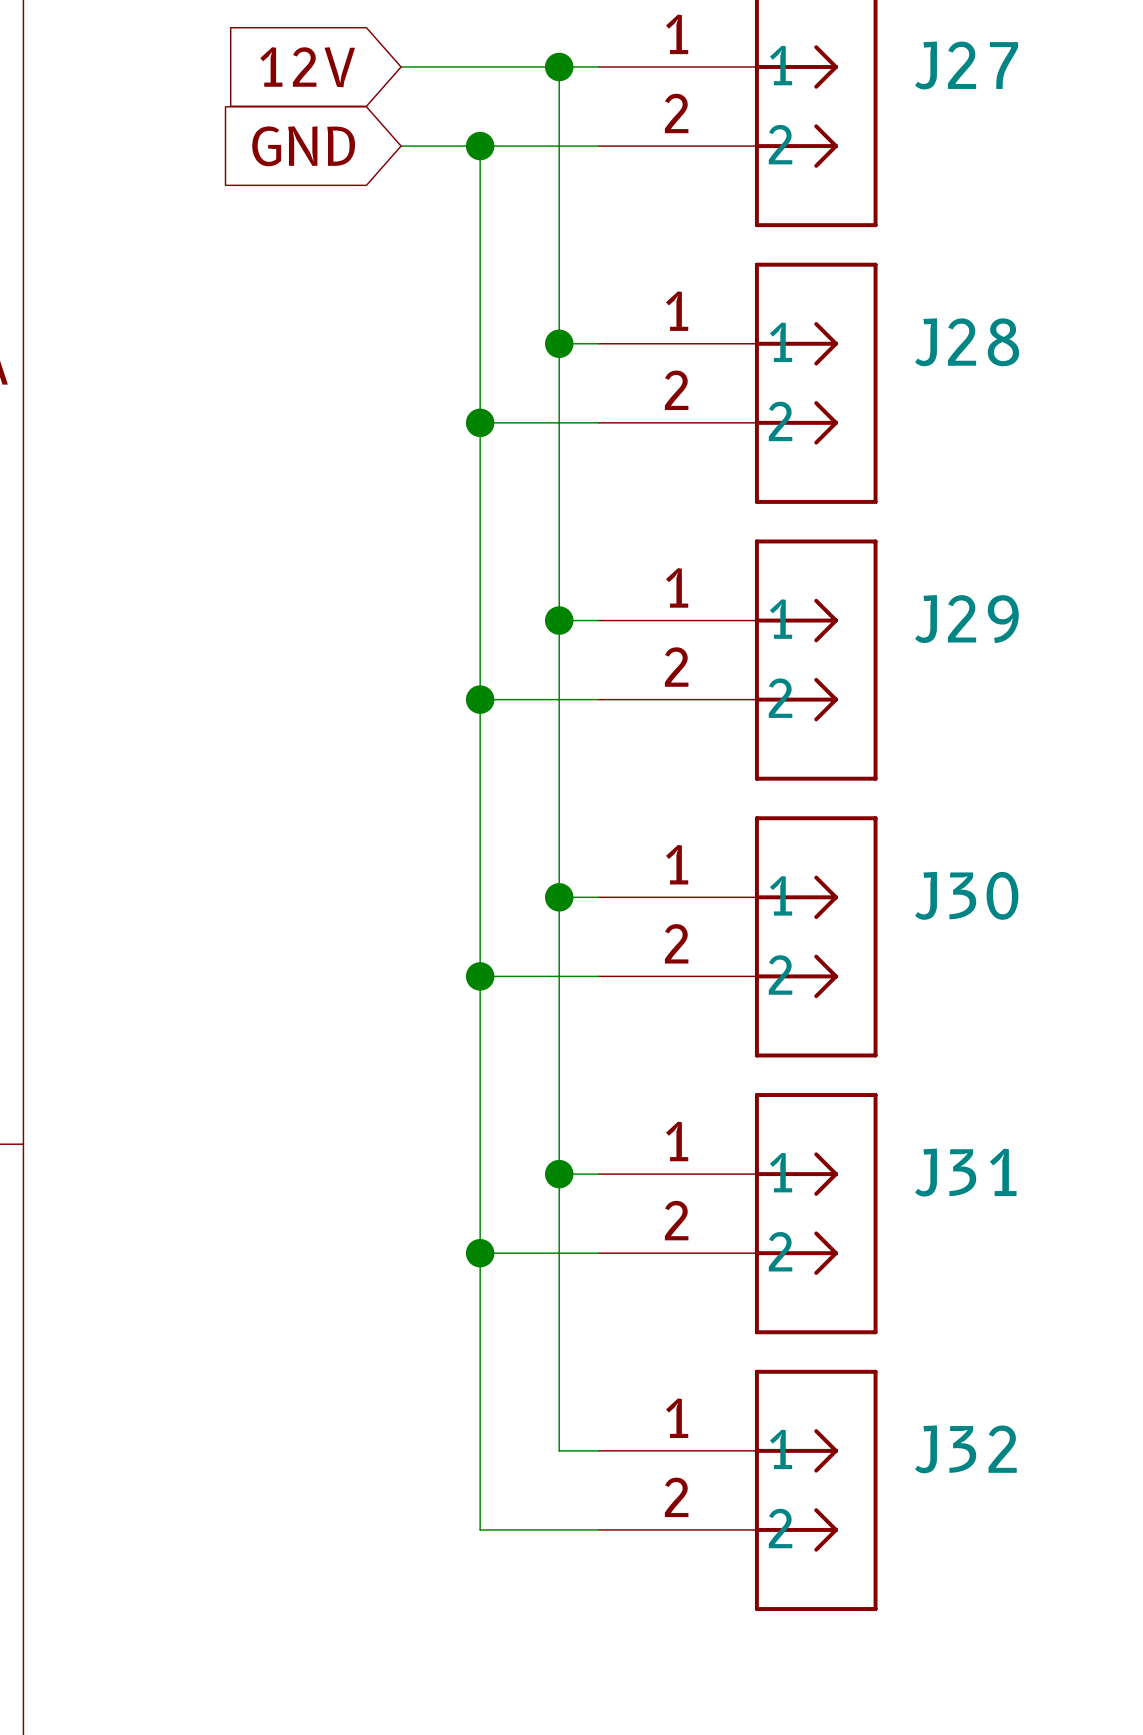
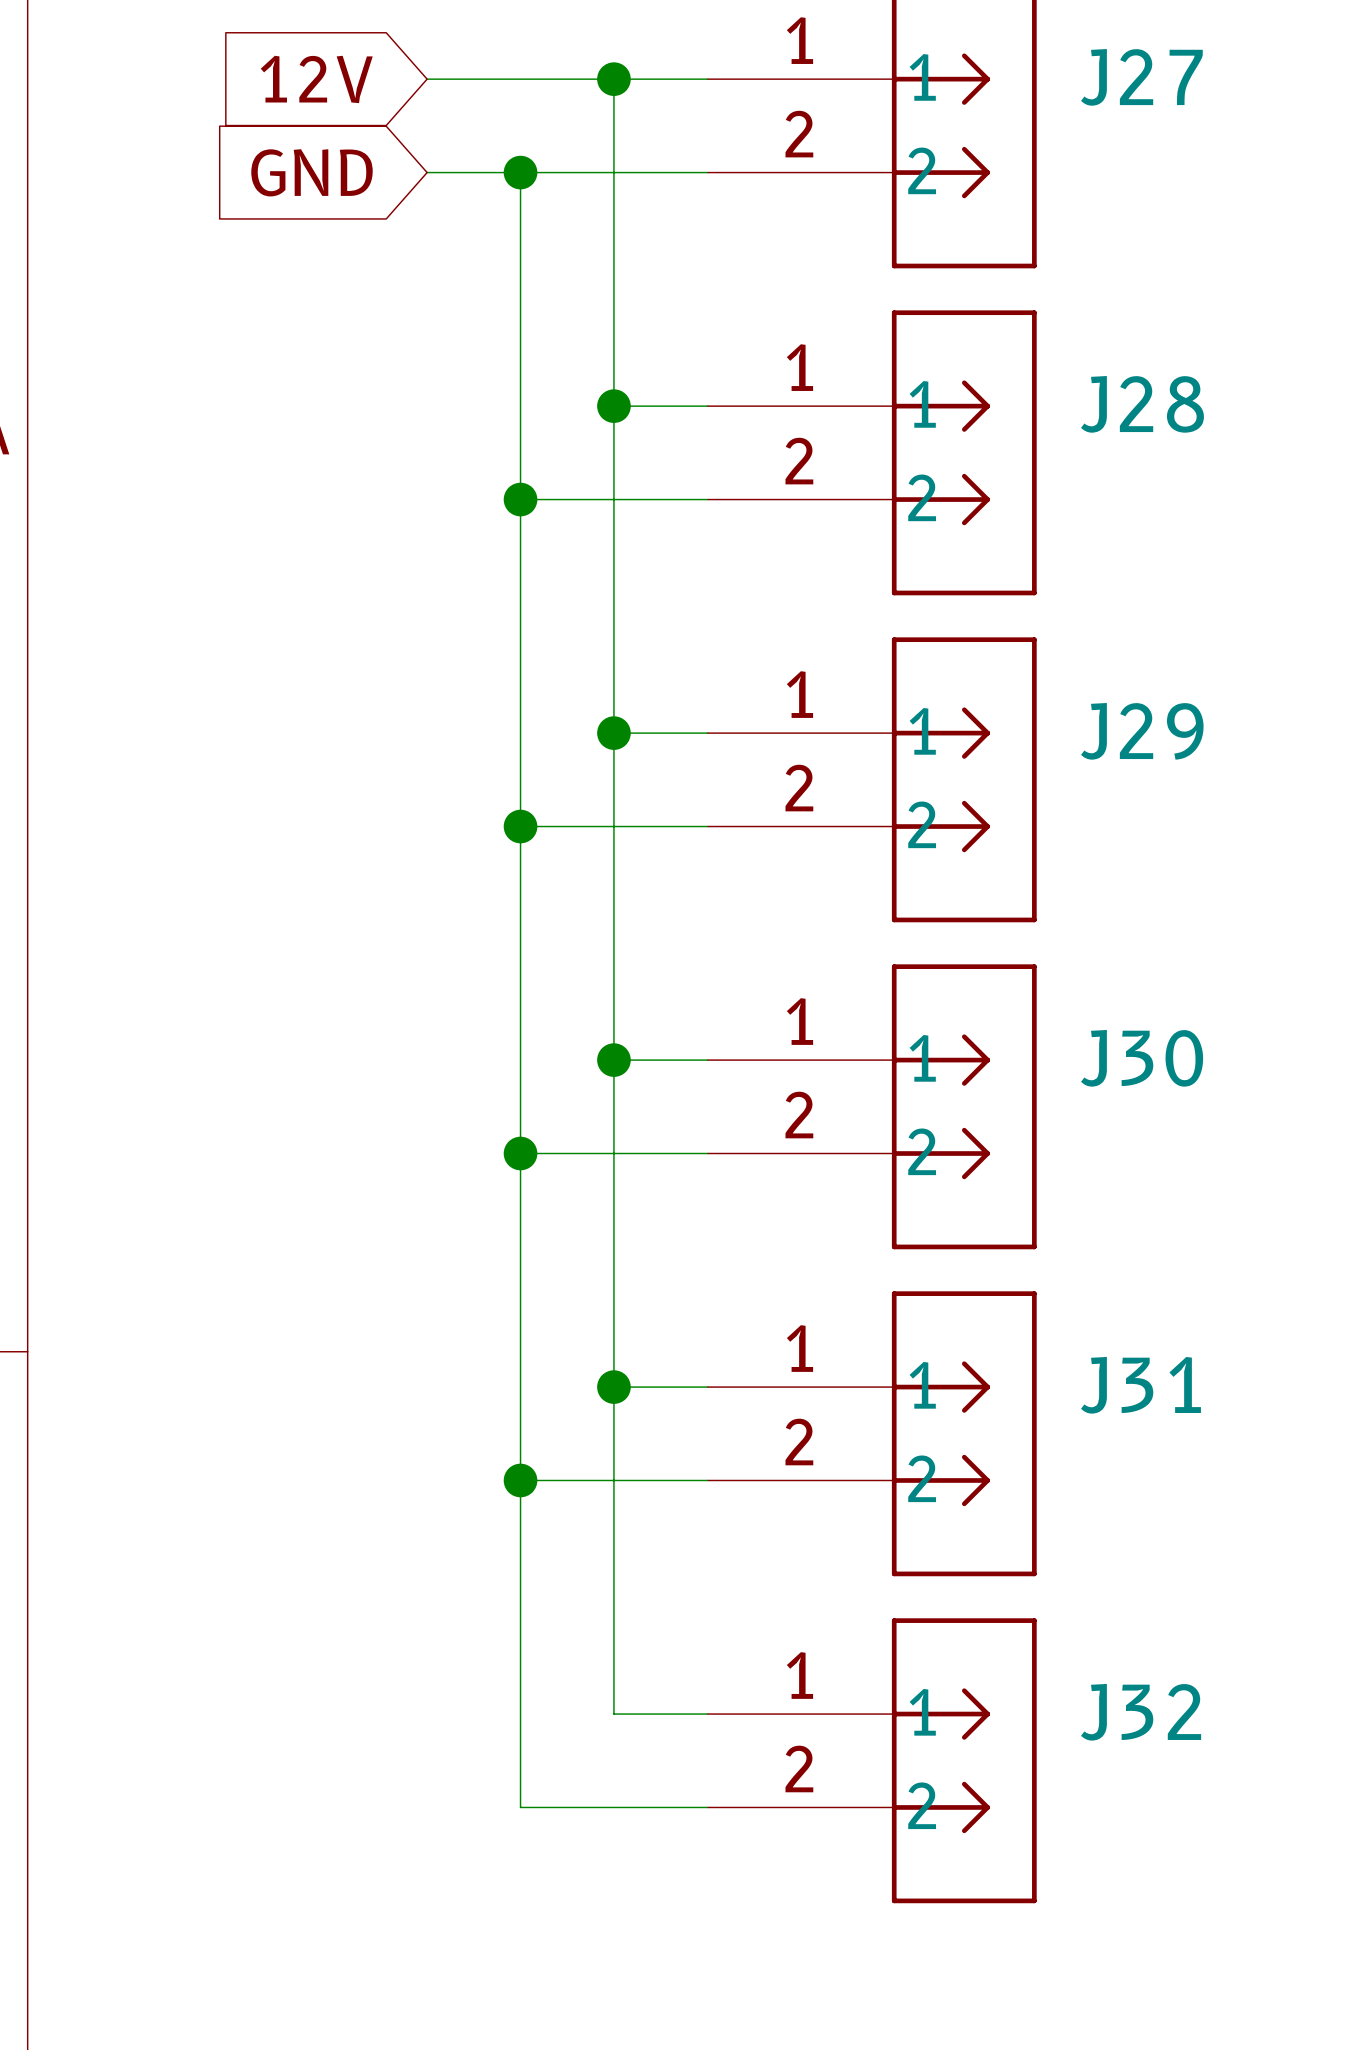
wire: none -> (427, 79) (473, 79)
wire: (559, 66) (559, 1450) -> (613, 79) (613, 1714) (660, 1714)
junction position: (559, 66) -> (613, 79)
global label position: 12V (307, 67) -> 12V (316, 79)
global label position: GND (303, 146) -> GND (311, 172)
wire: none -> (427, 172) (473, 172)
wire: (480, 146) (480, 1529) -> (520, 172) (520, 1807) (567, 1807)
junction position: (480, 146) -> (520, 172)
wire: none -> (613, 406) (660, 406)
junction position: (559, 343) -> (613, 406)
wire: none -> (520, 499) (567, 499)
junction position: (480, 422) -> (520, 499)
wire: none -> (613, 733) (660, 733)
junction position: (559, 620) -> (613, 733)
wire: none -> (520, 826) (567, 826)
junction position: (480, 699) -> (520, 826)
wire: none -> (613, 1060) (660, 1060)
junction position: (559, 897) -> (613, 1060)
wire: none -> (520, 1153) (567, 1153)
junction position: (480, 976) -> (520, 1153)
wire: none -> (613, 1387) (660, 1387)
junction position: (559, 1174) -> (613, 1387)
wire: none -> (520, 1480) (567, 1480)
junction position: (480, 1253) -> (520, 1480)

